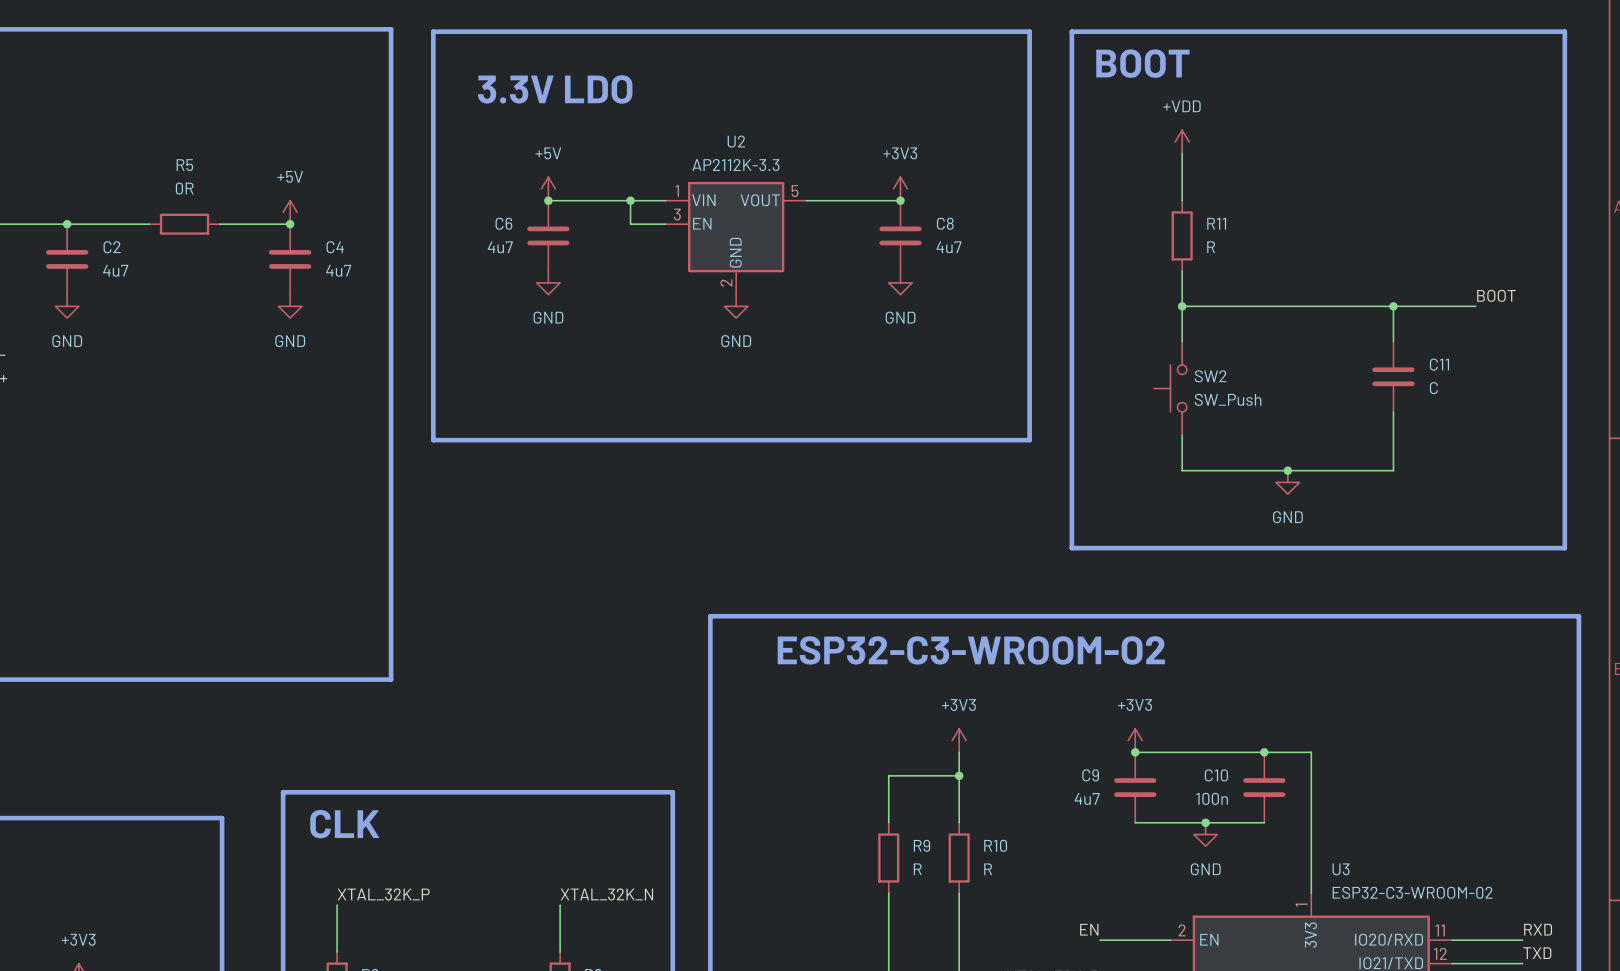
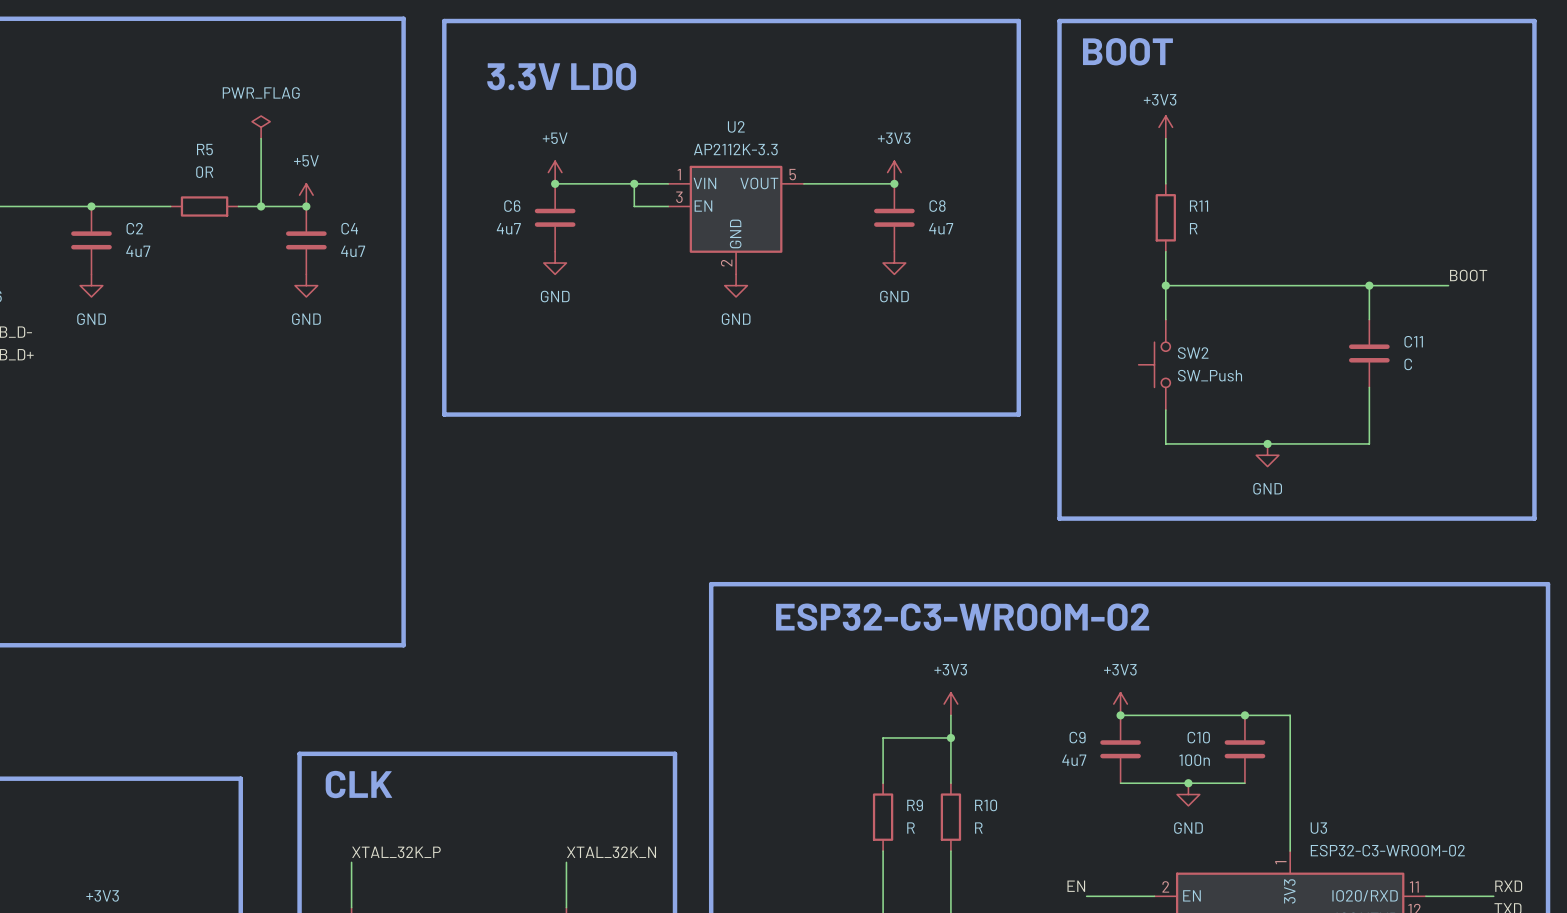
power symbol: none -> PWR_FLAG (261, 127)
power symbol: +VDD (1182, 142) -> +3V3 (1165, 127)
wire: none -> (261, 138) (261, 206)
junction: none -> (261, 206)

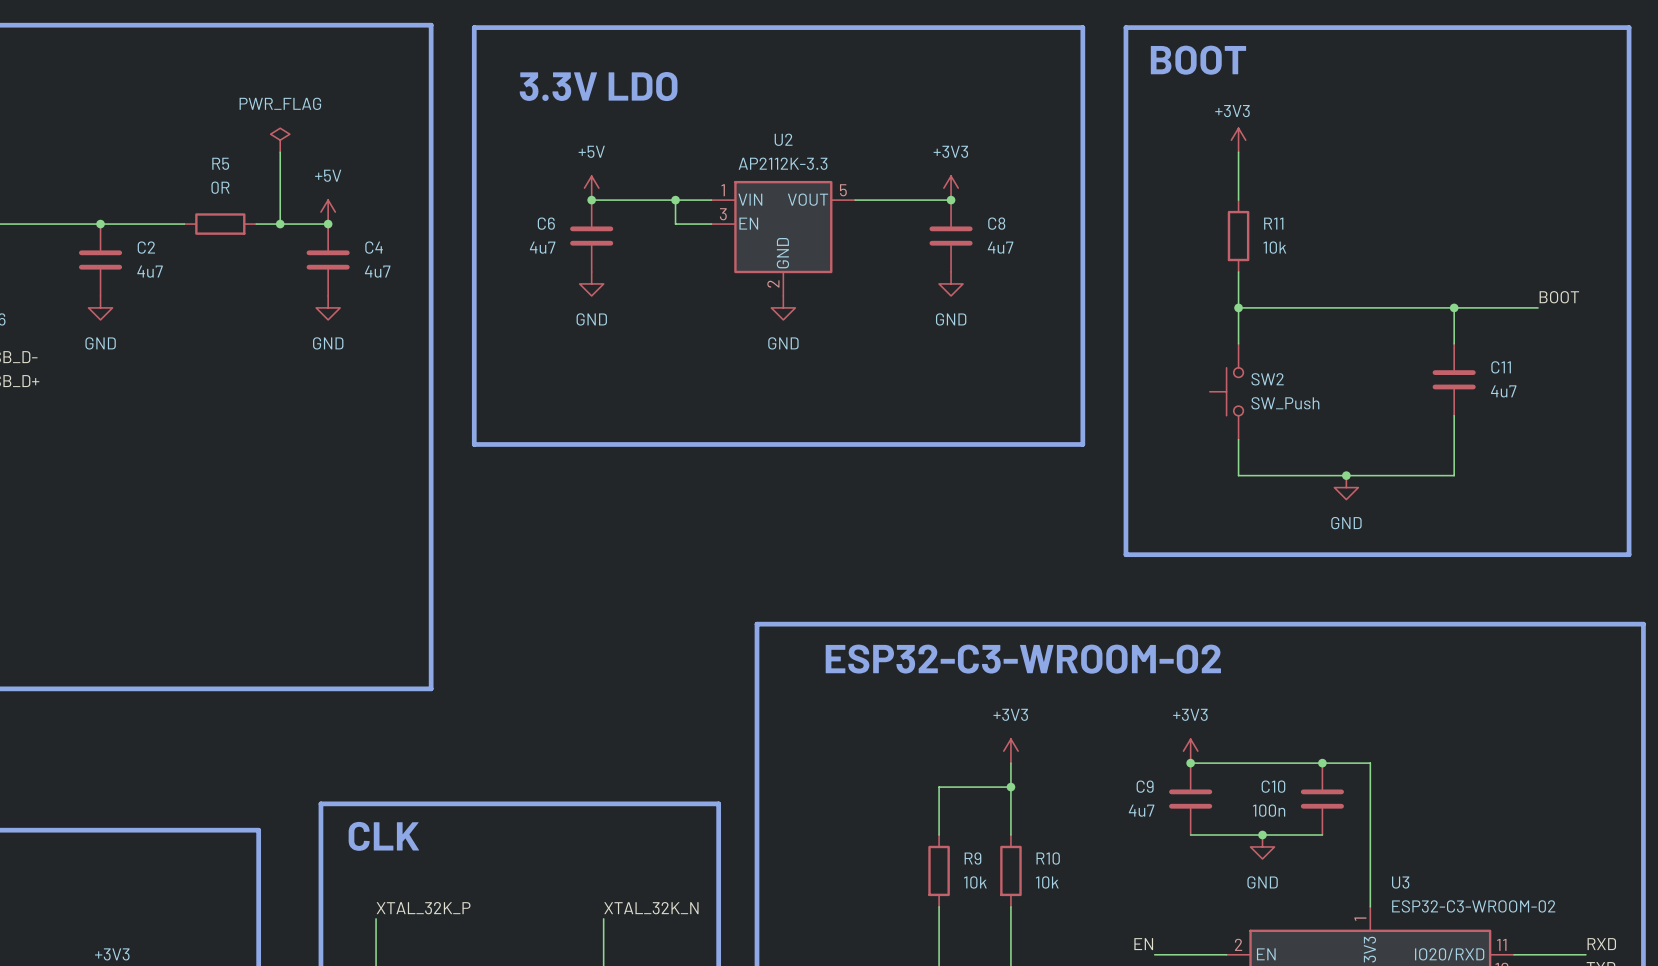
R11 value: R (1193, 228) -> 10k (1274, 247)
C11 value: C (1408, 364) -> 4u7 (1503, 391)
R9 value: R (911, 828) -> 10k (975, 882)
R10 value: R (978, 828) -> 10k (1047, 882)

